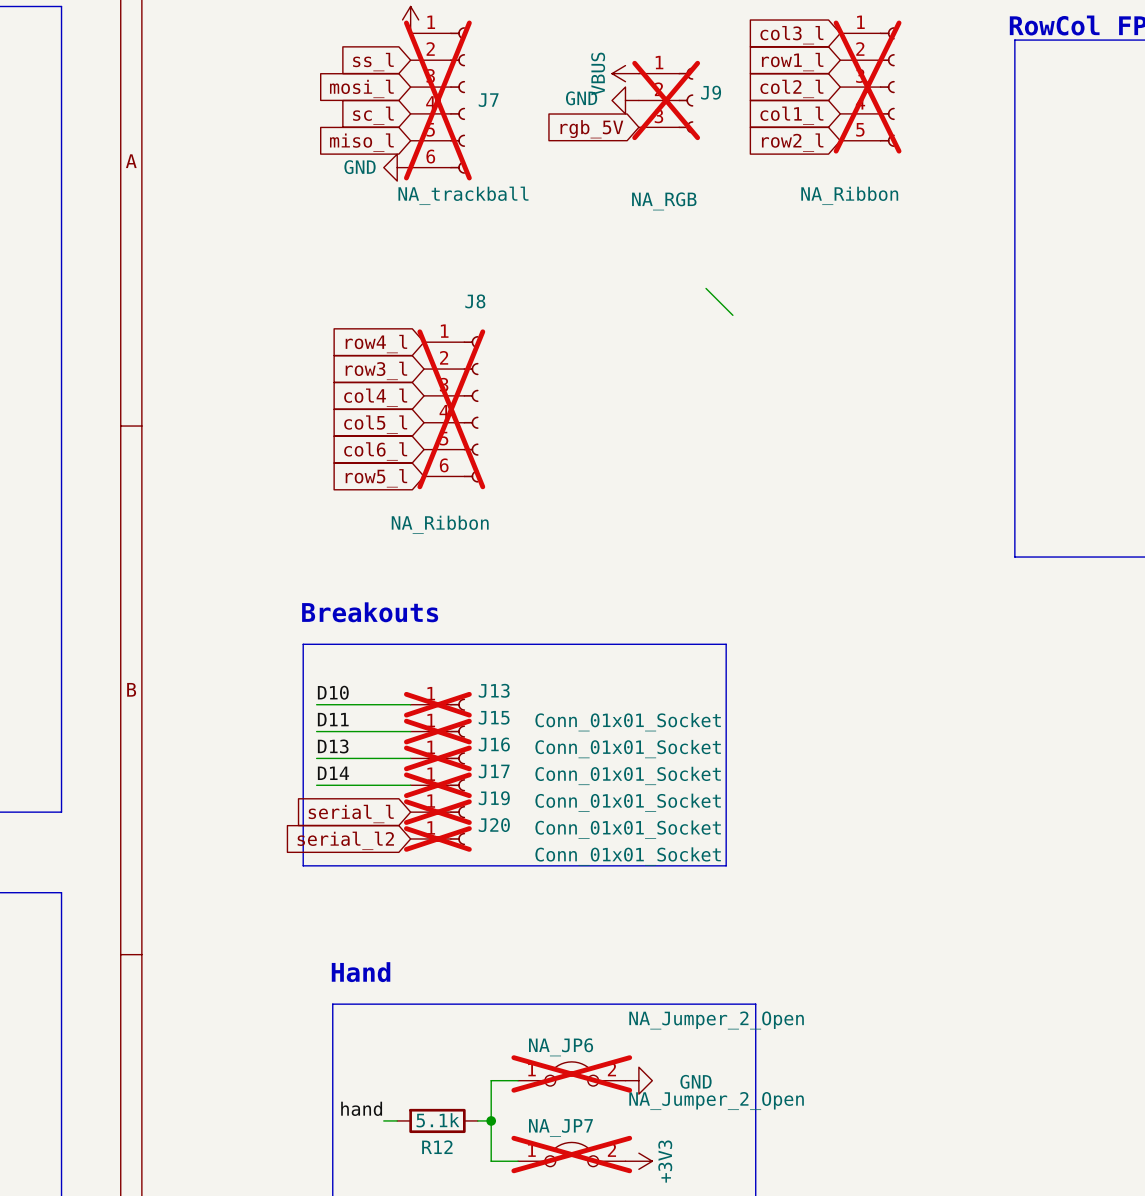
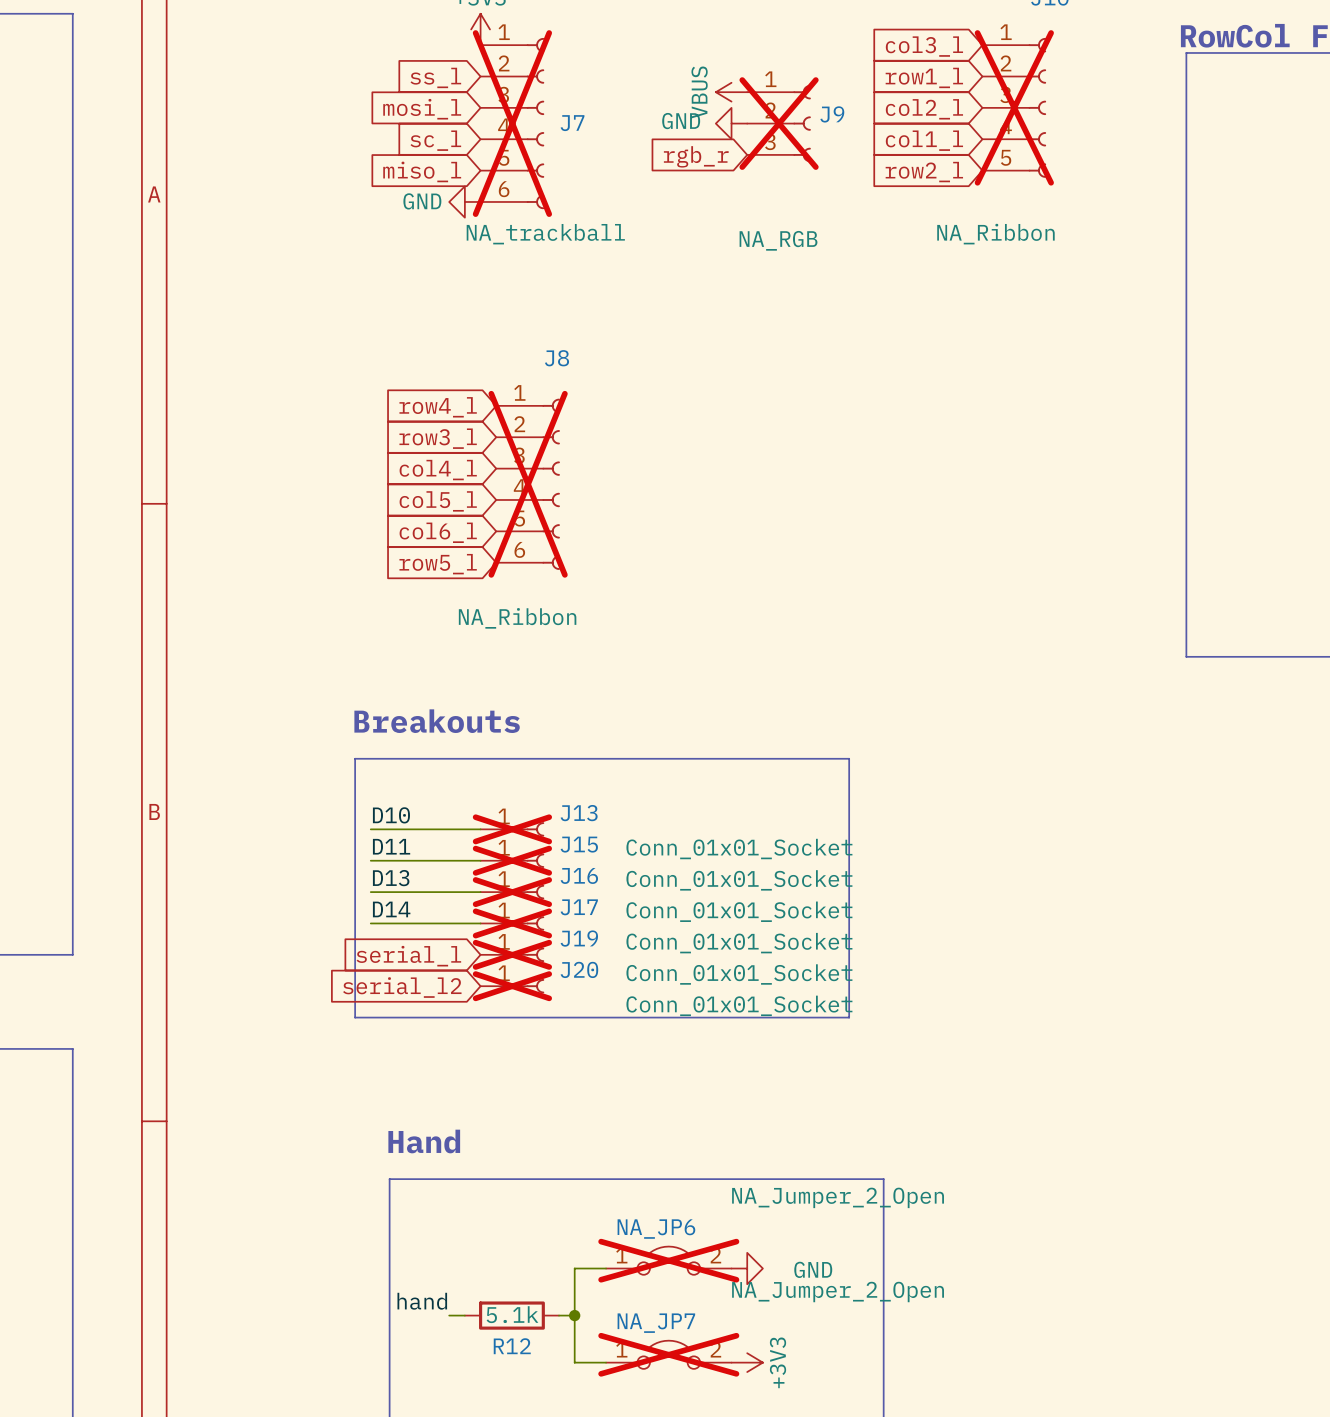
global label: rgb_5V (591, 129) -> rgb_r (696, 156)
wire: (706, 288) (732, 315) -> none

